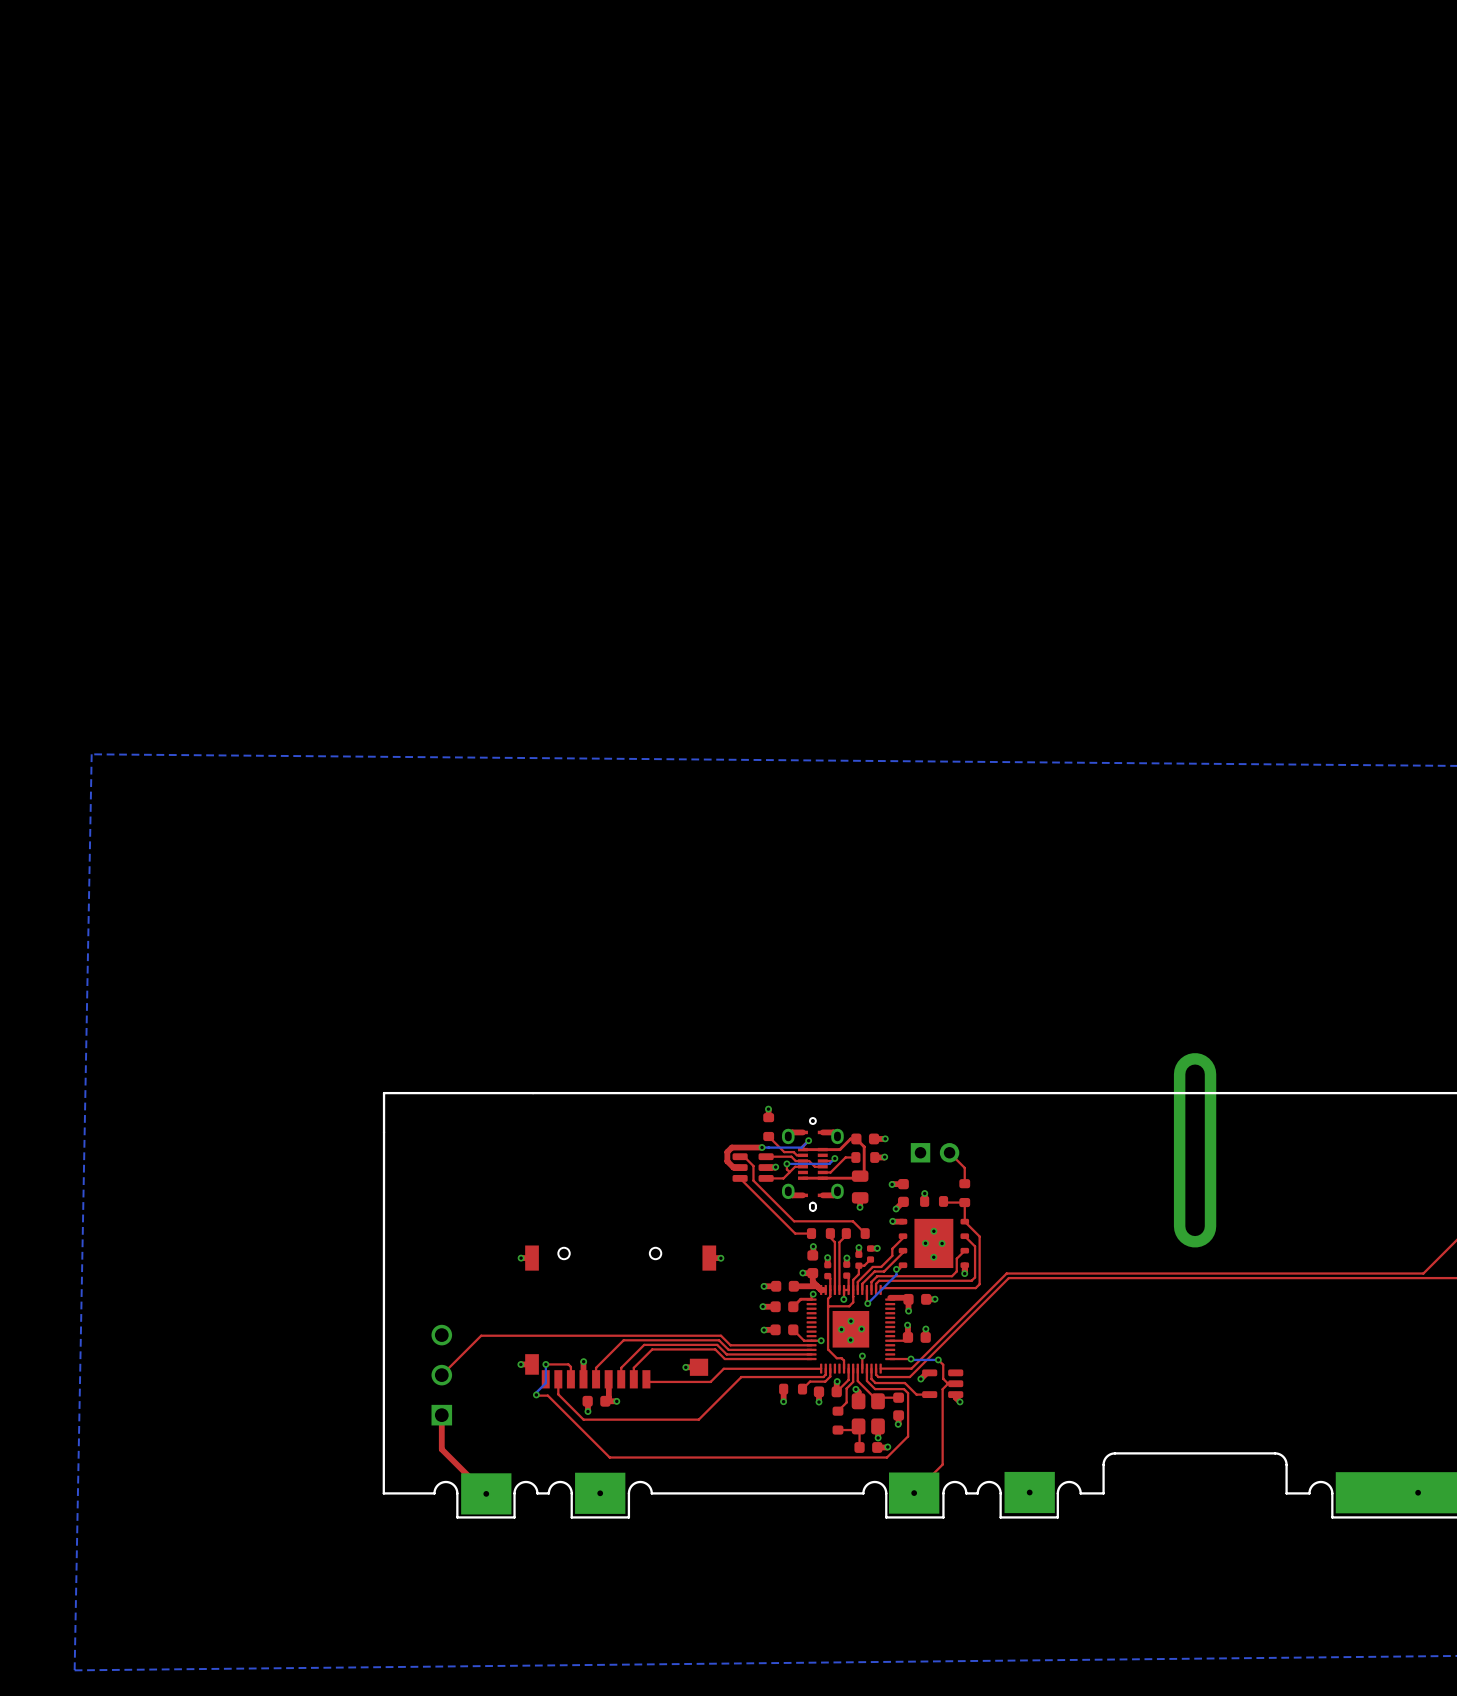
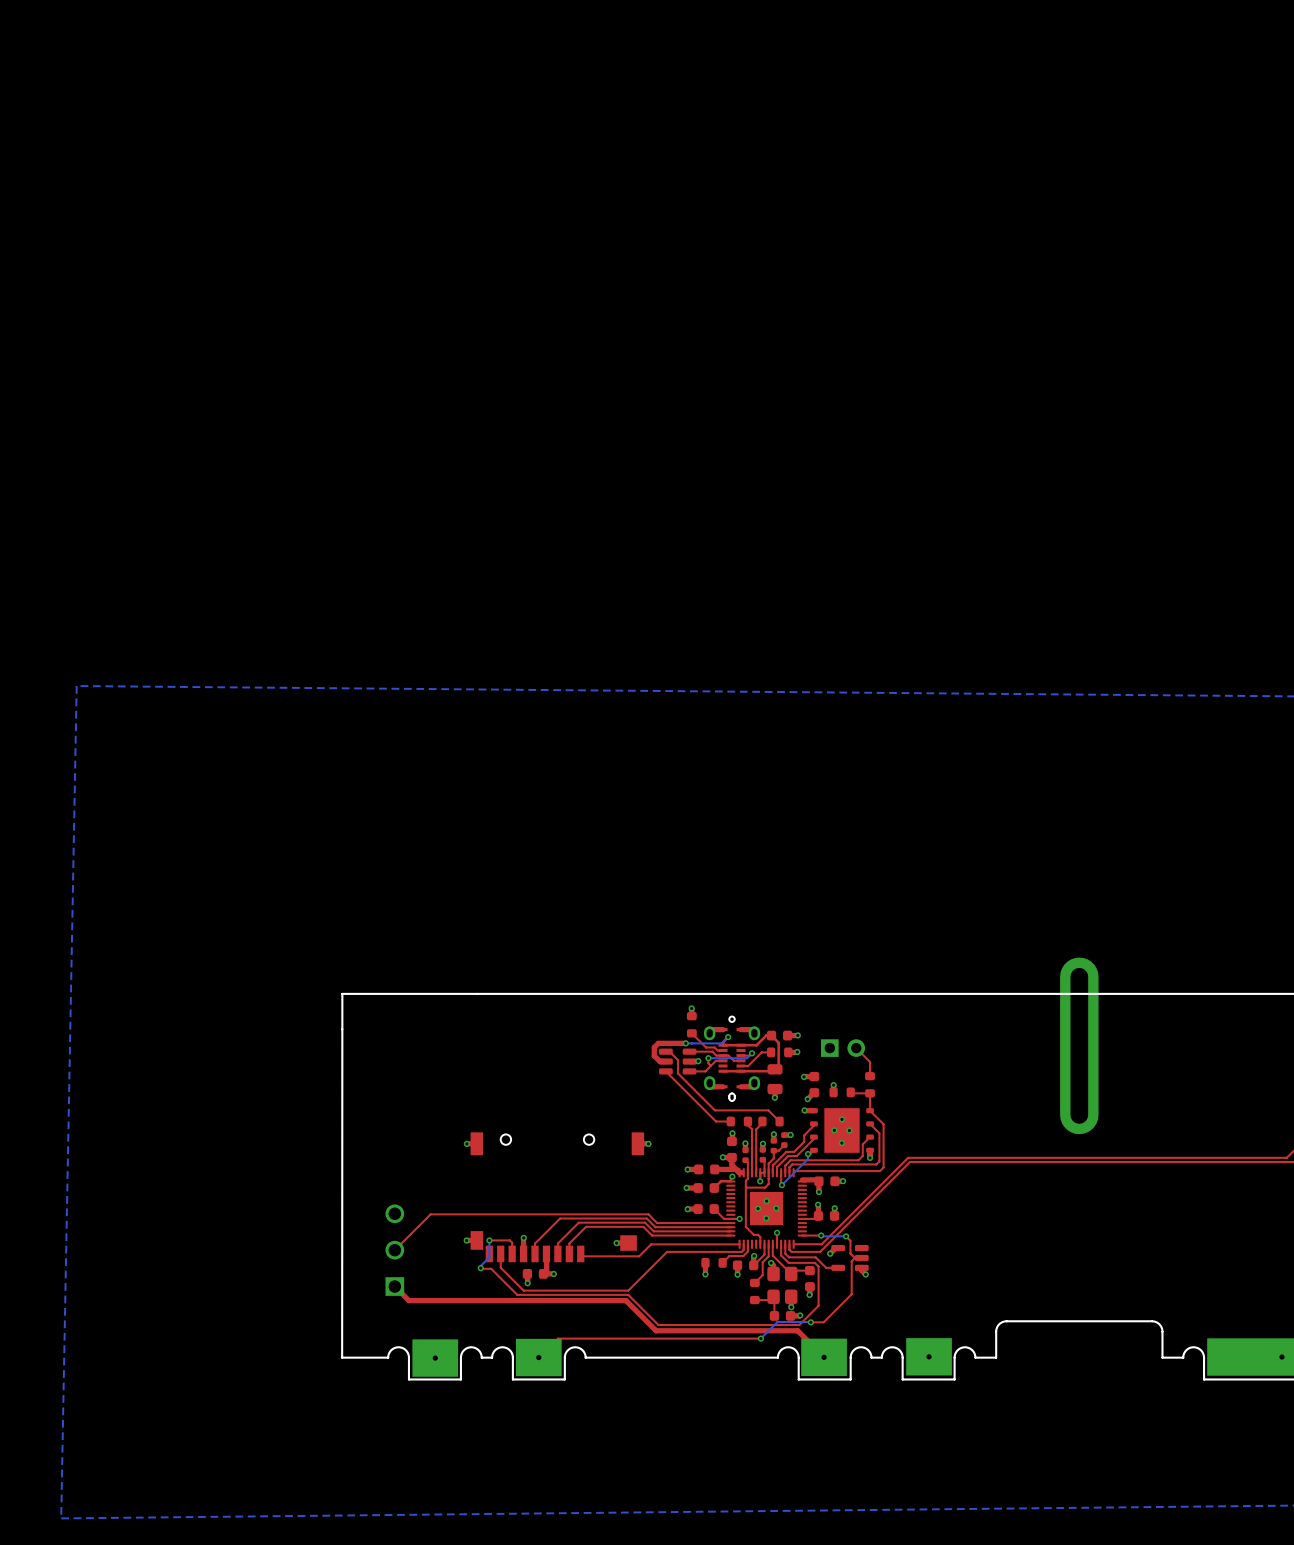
top track: (948, 1383) (942, 1389) (942, 1464) (914, 1493) -> (854, 1257) (851, 1261) (851, 1294) (823, 1322) (810, 1322)
top track: (441, 1415) (441, 1449) (486, 1493) -> (394, 1286) (408, 1300) (625, 1300) (656, 1330) (797, 1330) (824, 1357)
top track: (576, 1424) (609, 1457) (731, 1457) -> (517, 1294) (628, 1294) (658, 1325)
bottom track: none -> (810, 1322) (777, 1322) (760, 1338)
via: none -> (810, 1322)
top track: none -> (760, 1338) (558, 1338) (539, 1357)
via: none -> (760, 1338)

